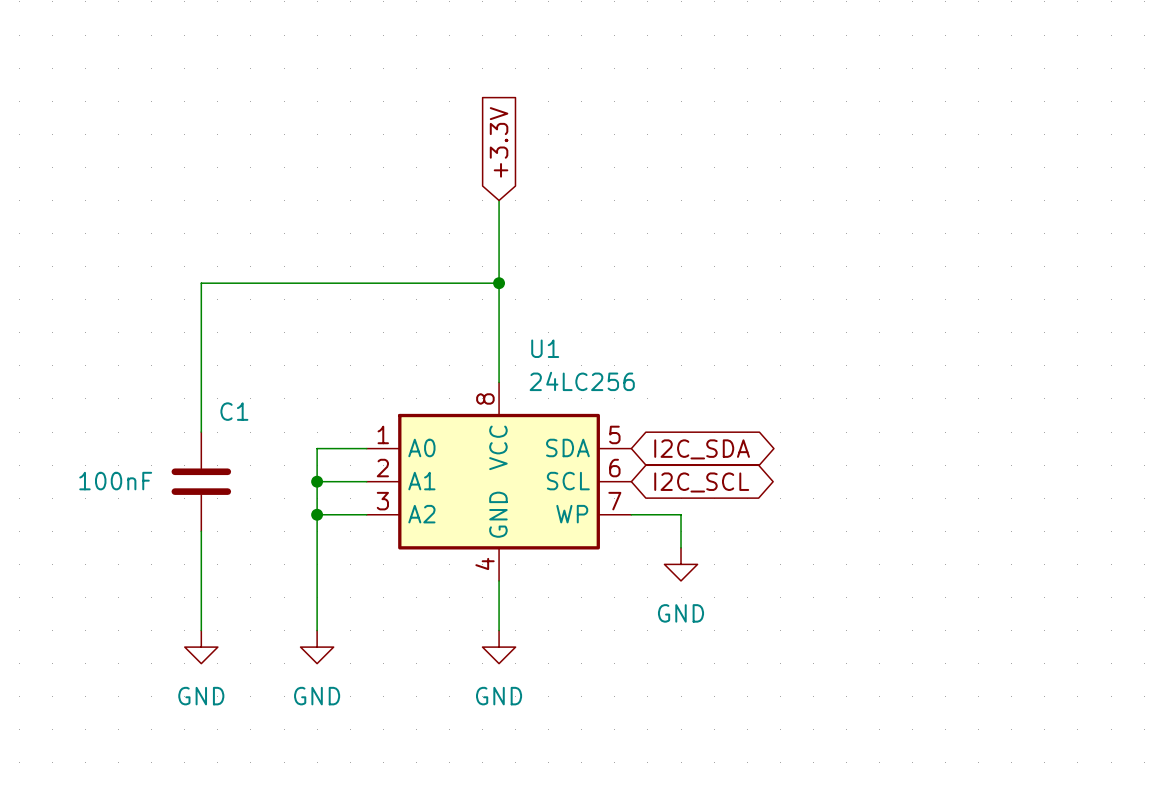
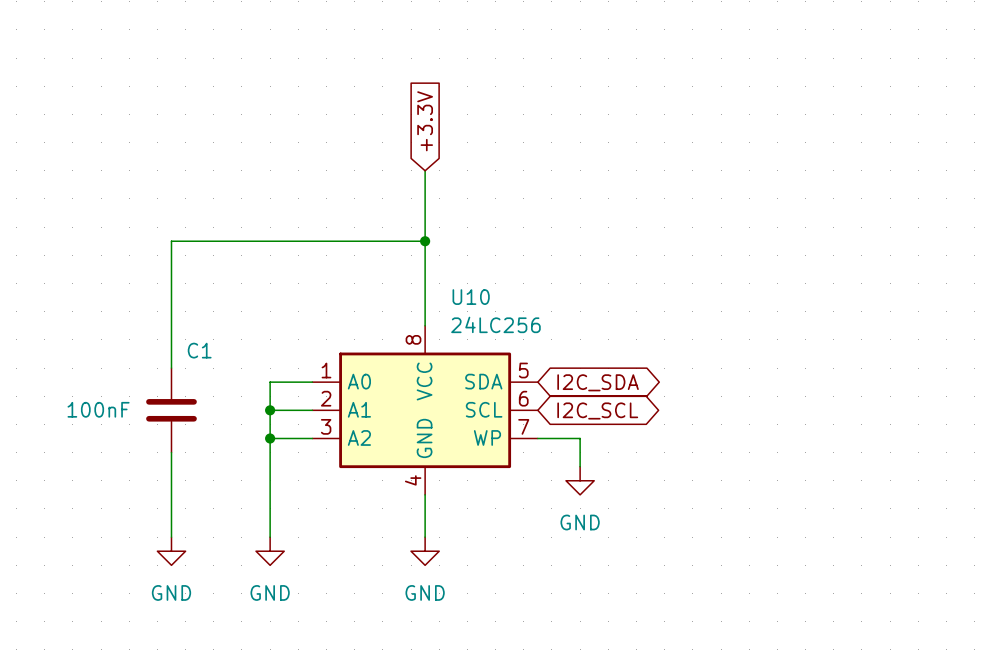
U1 name: U1 (545, 348) -> U10 (471, 297)

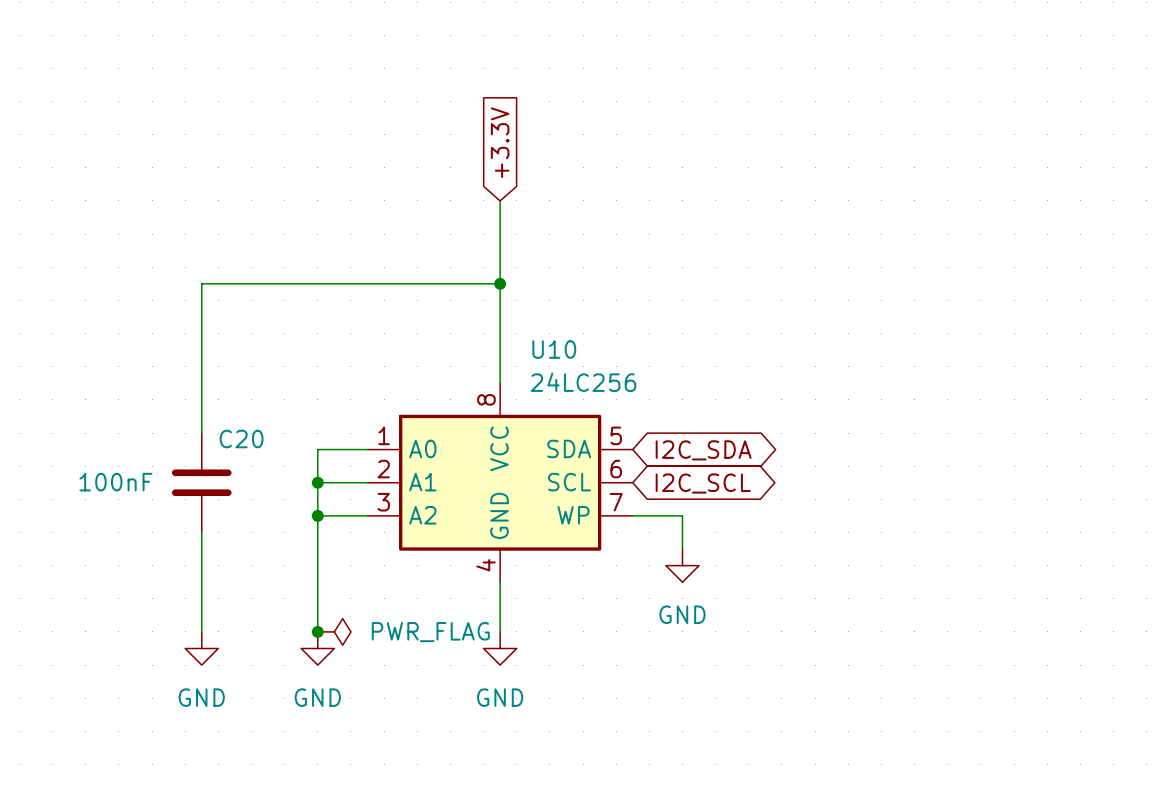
C1 name: C1 (199, 350) -> C20 (241, 439)
junction: none -> (317, 631)
power symbol: none -> PWR_FLAG (334, 631)

